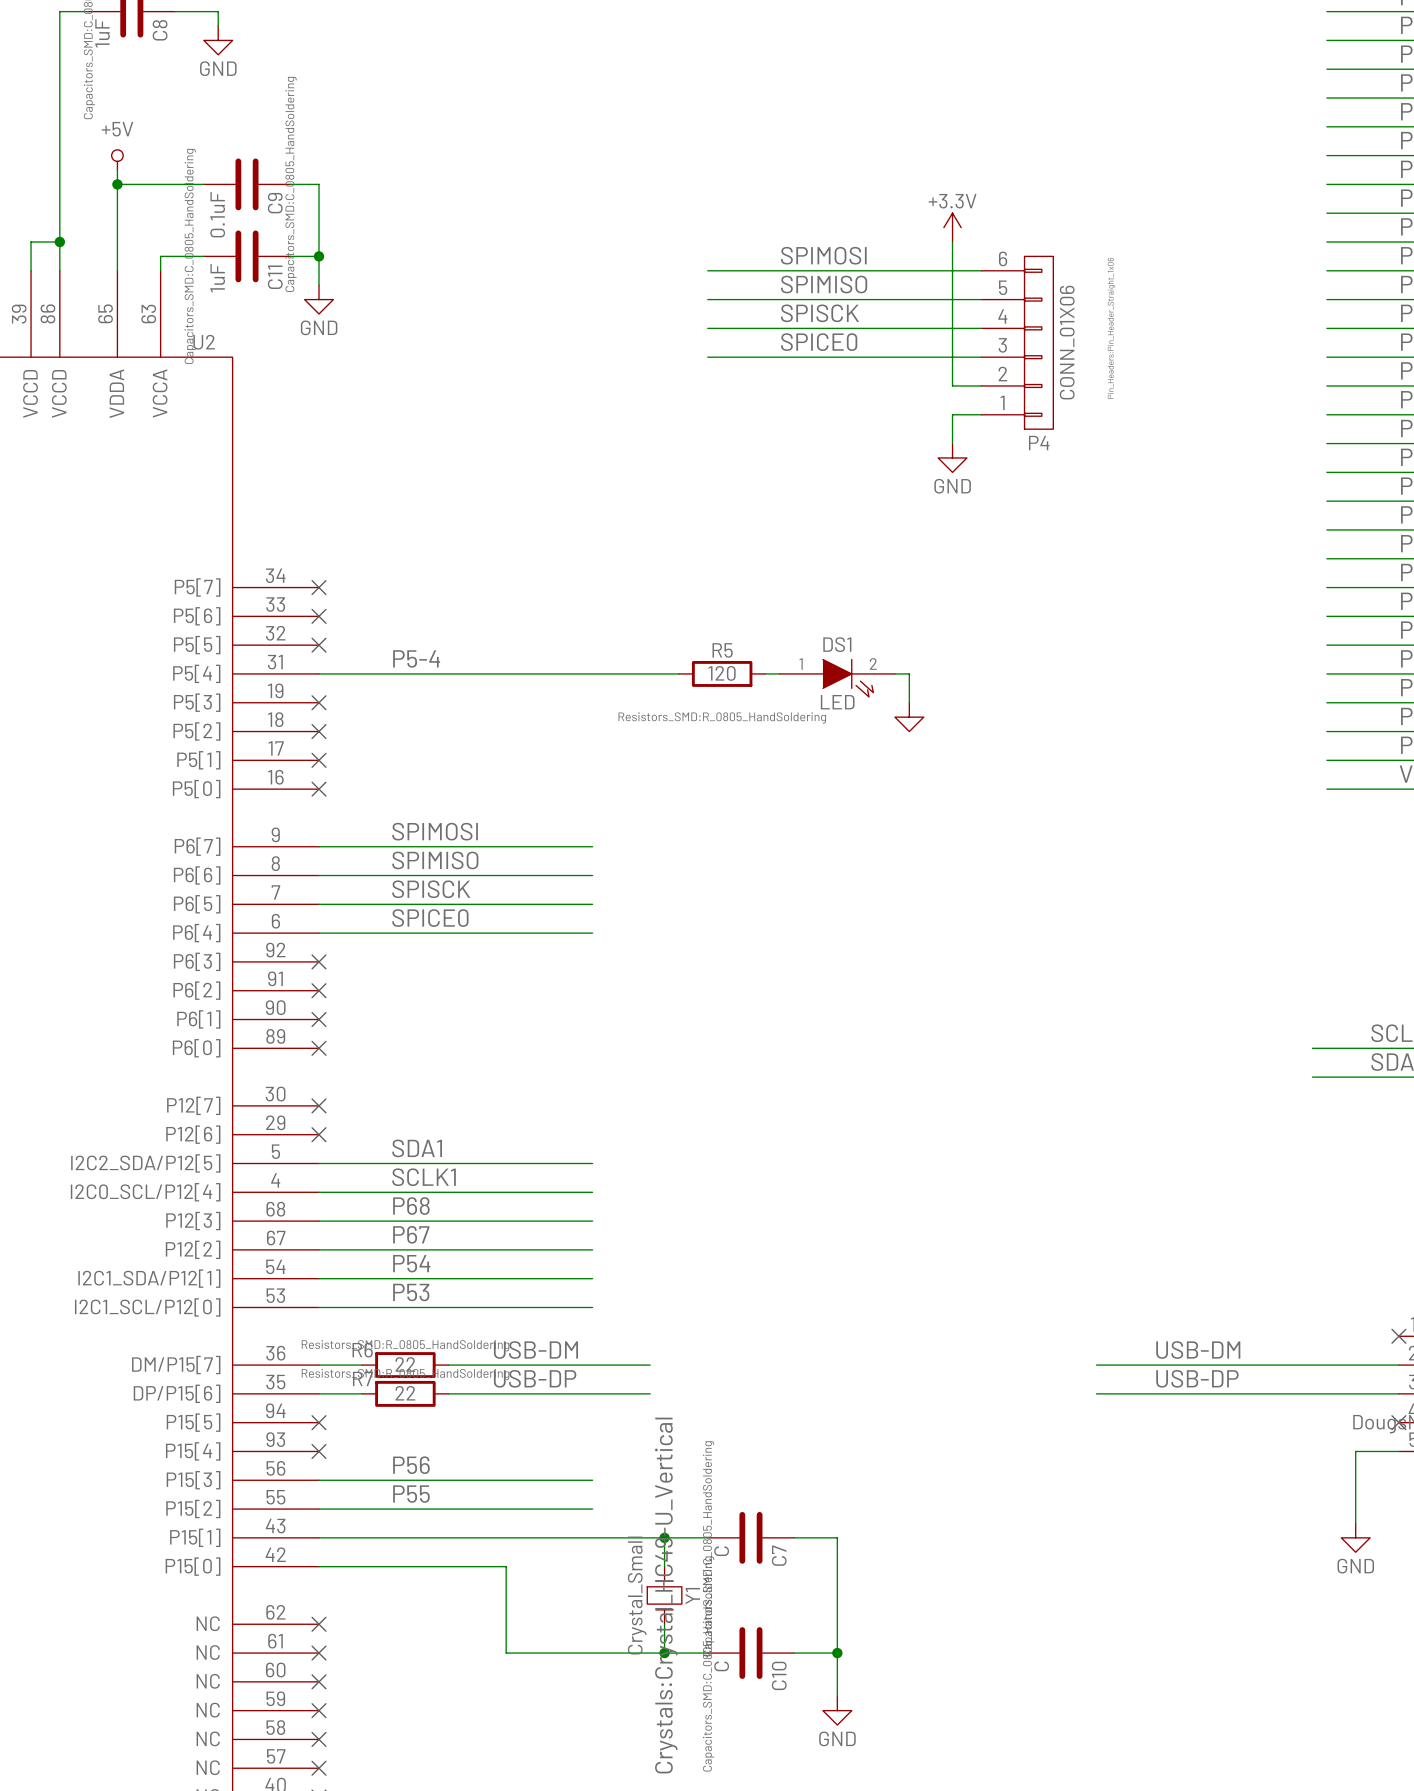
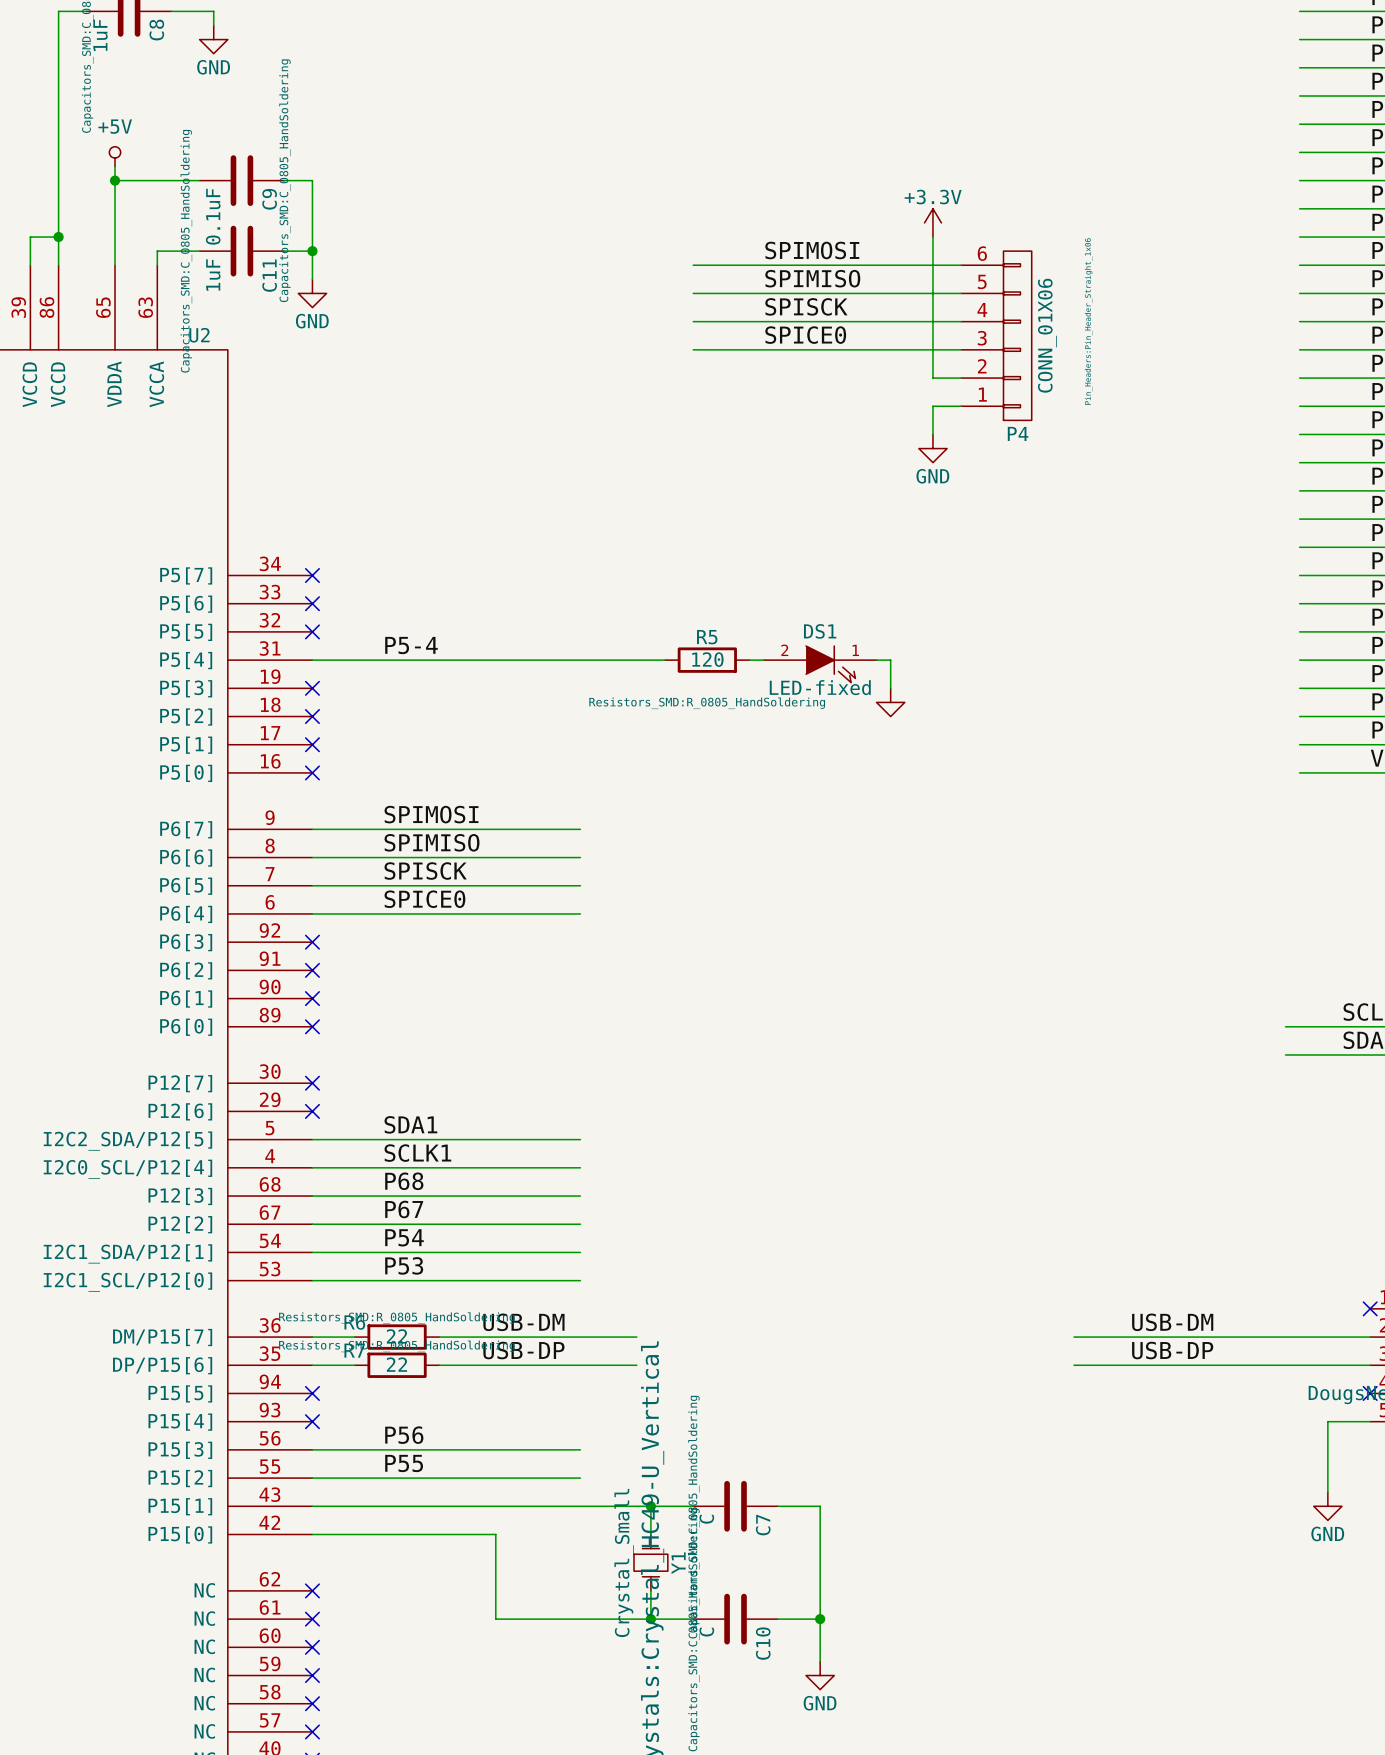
DS1 pin number: 2 (873, 663) -> 1 (855, 650)
DS1 pin number: 1 (801, 664) -> 2 (784, 650)
DS1 value: LED (837, 702) -> LED-fixed (820, 687)

